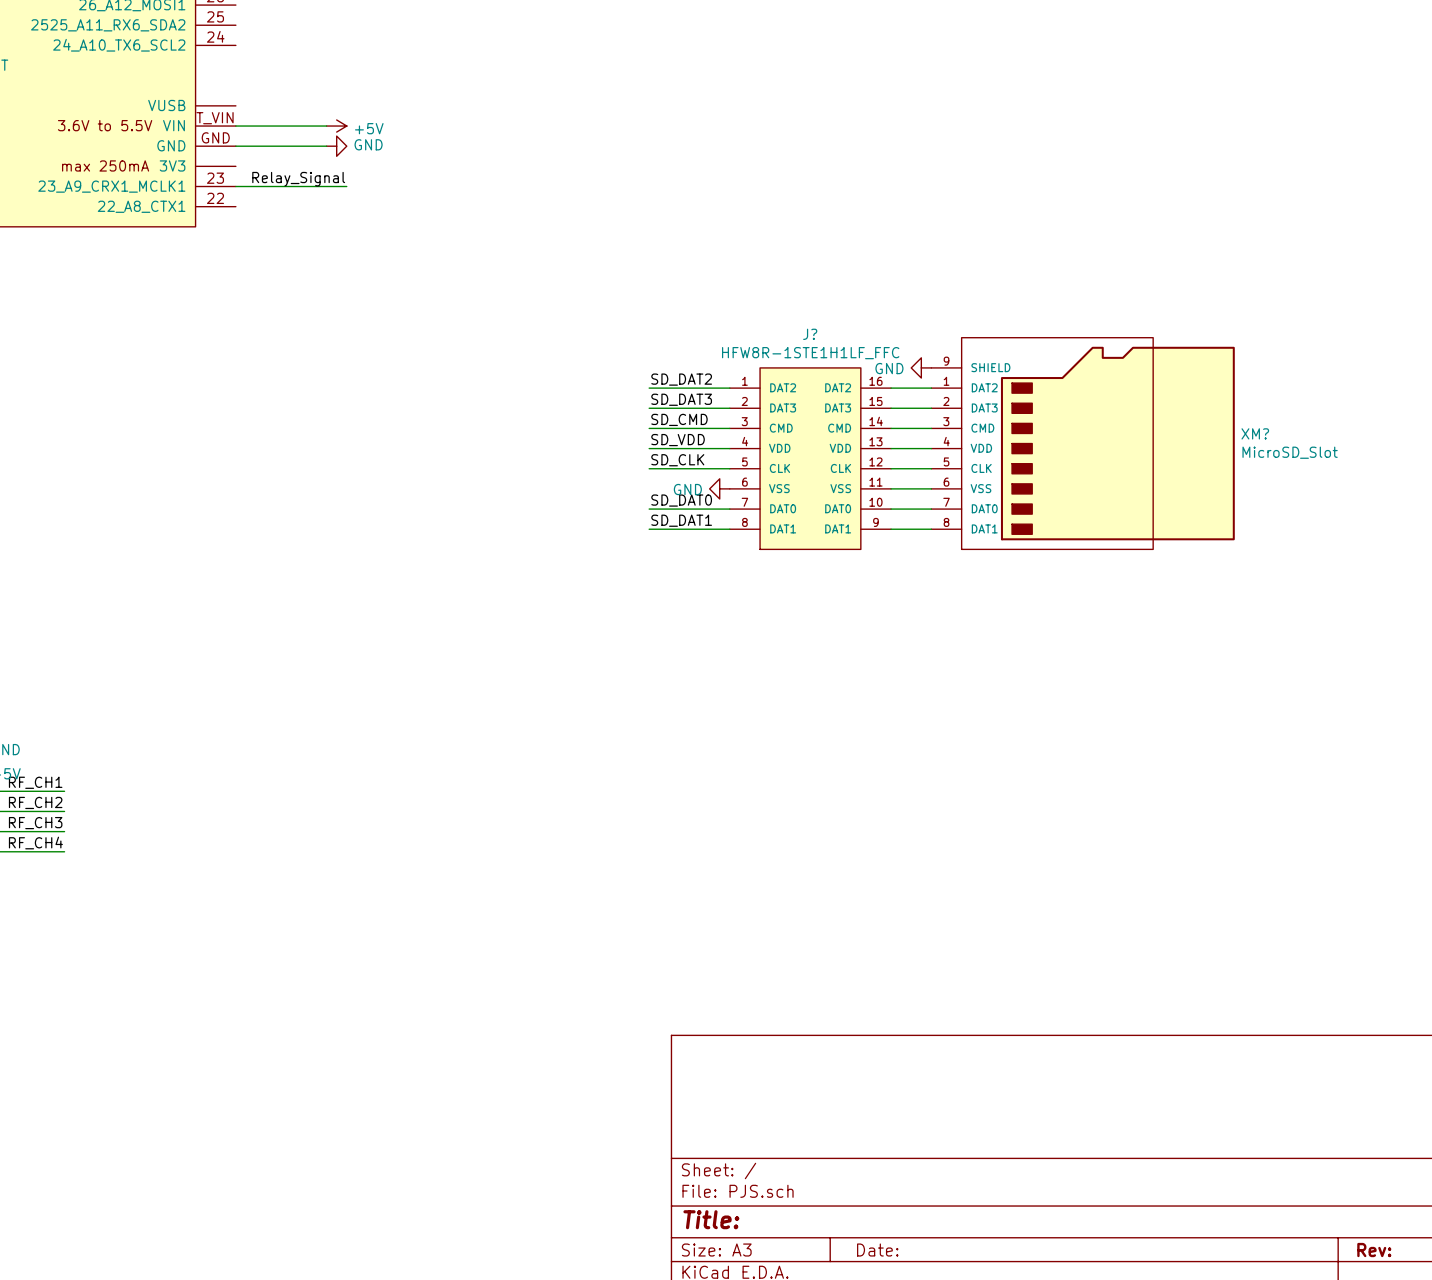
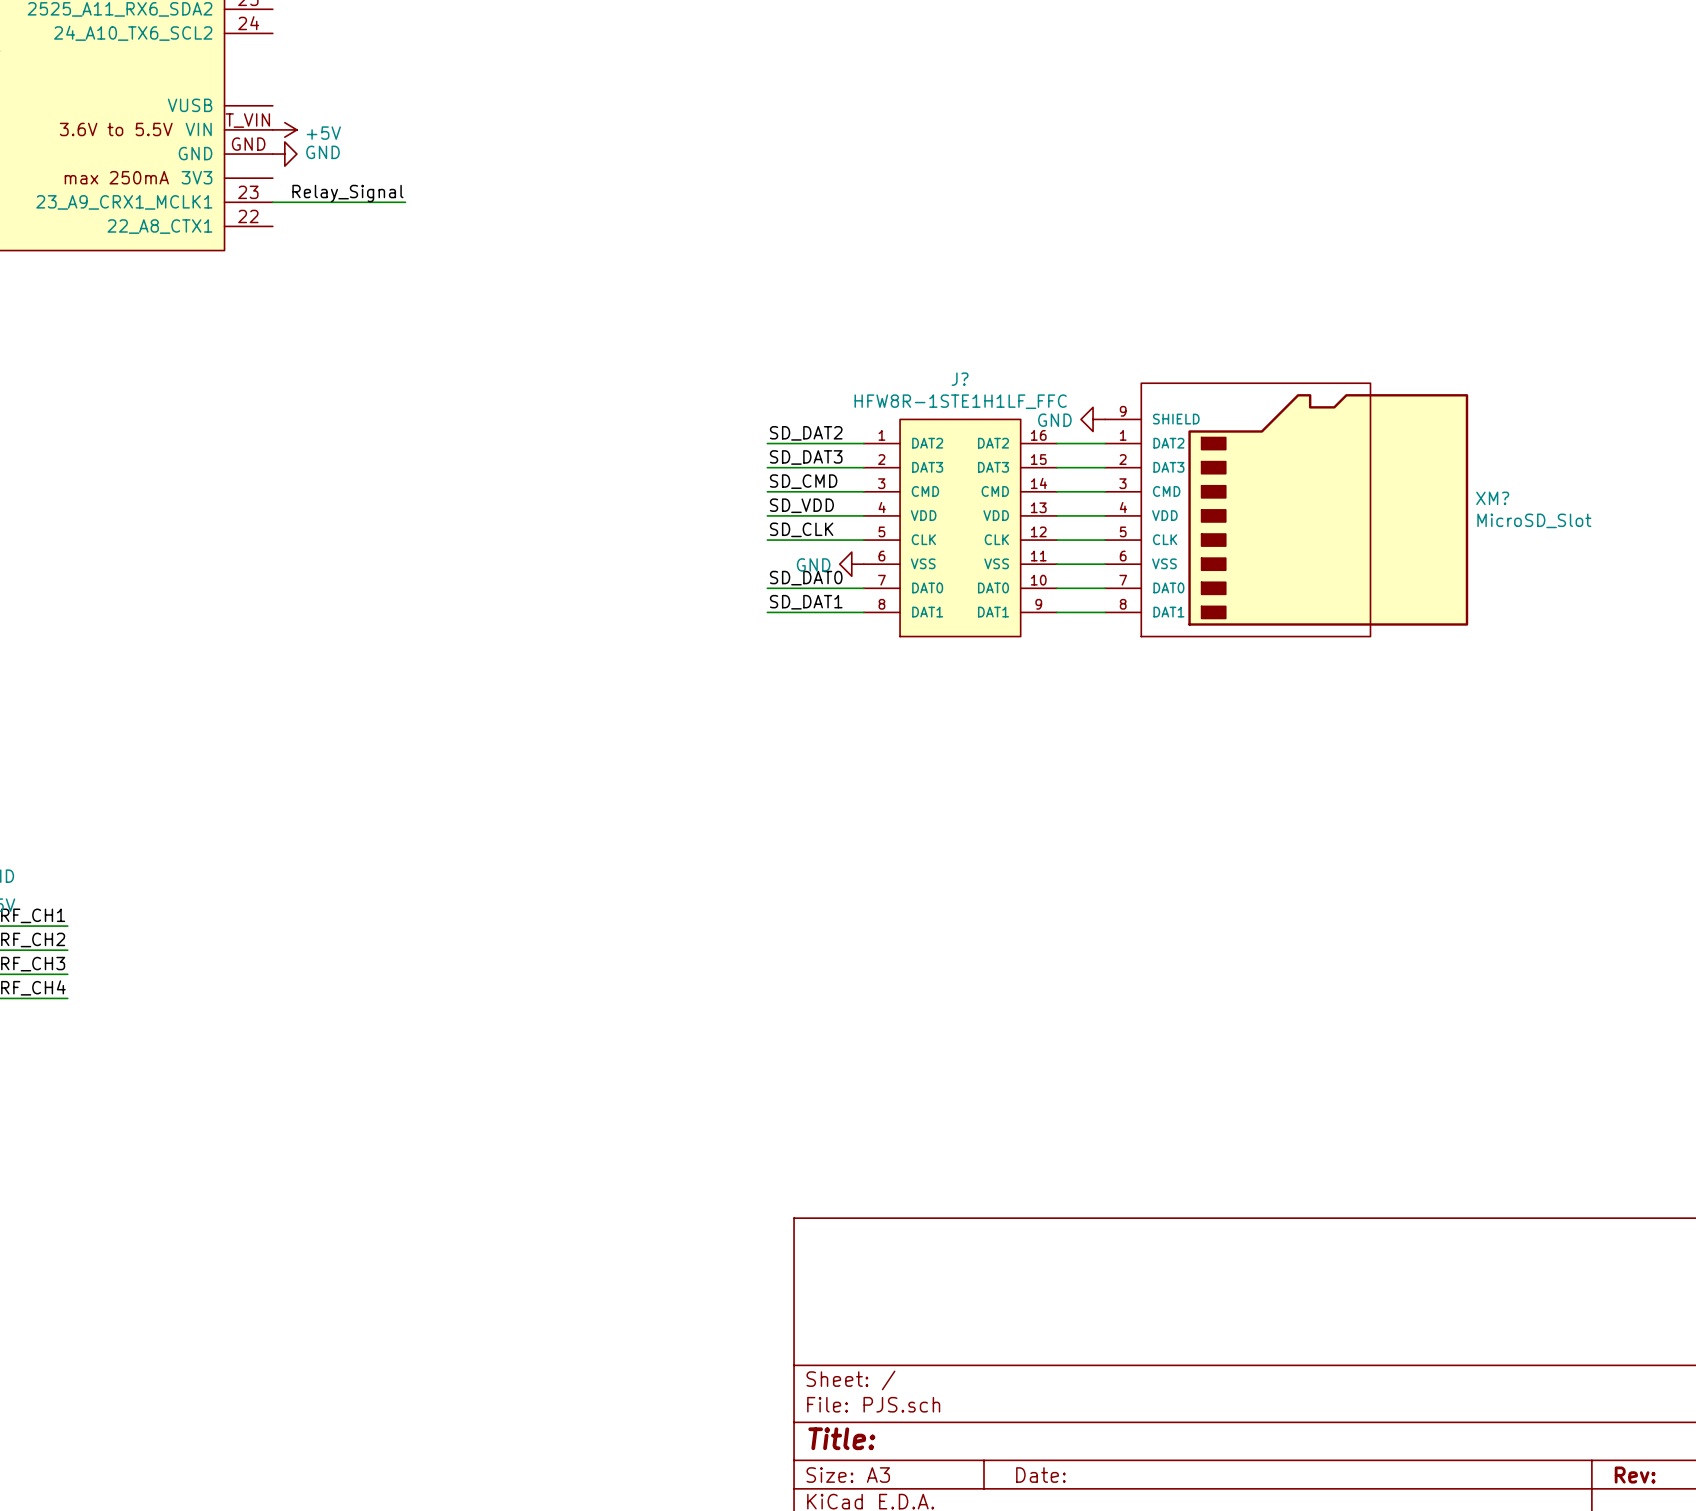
wire: (235, 126) (326, 126) -> none
power symbol position: +5V (336, 126) -> +5V (284, 129)
wire: (235, 146) (326, 146) -> none
power symbol position: GND (336, 146) -> GND (284, 154)

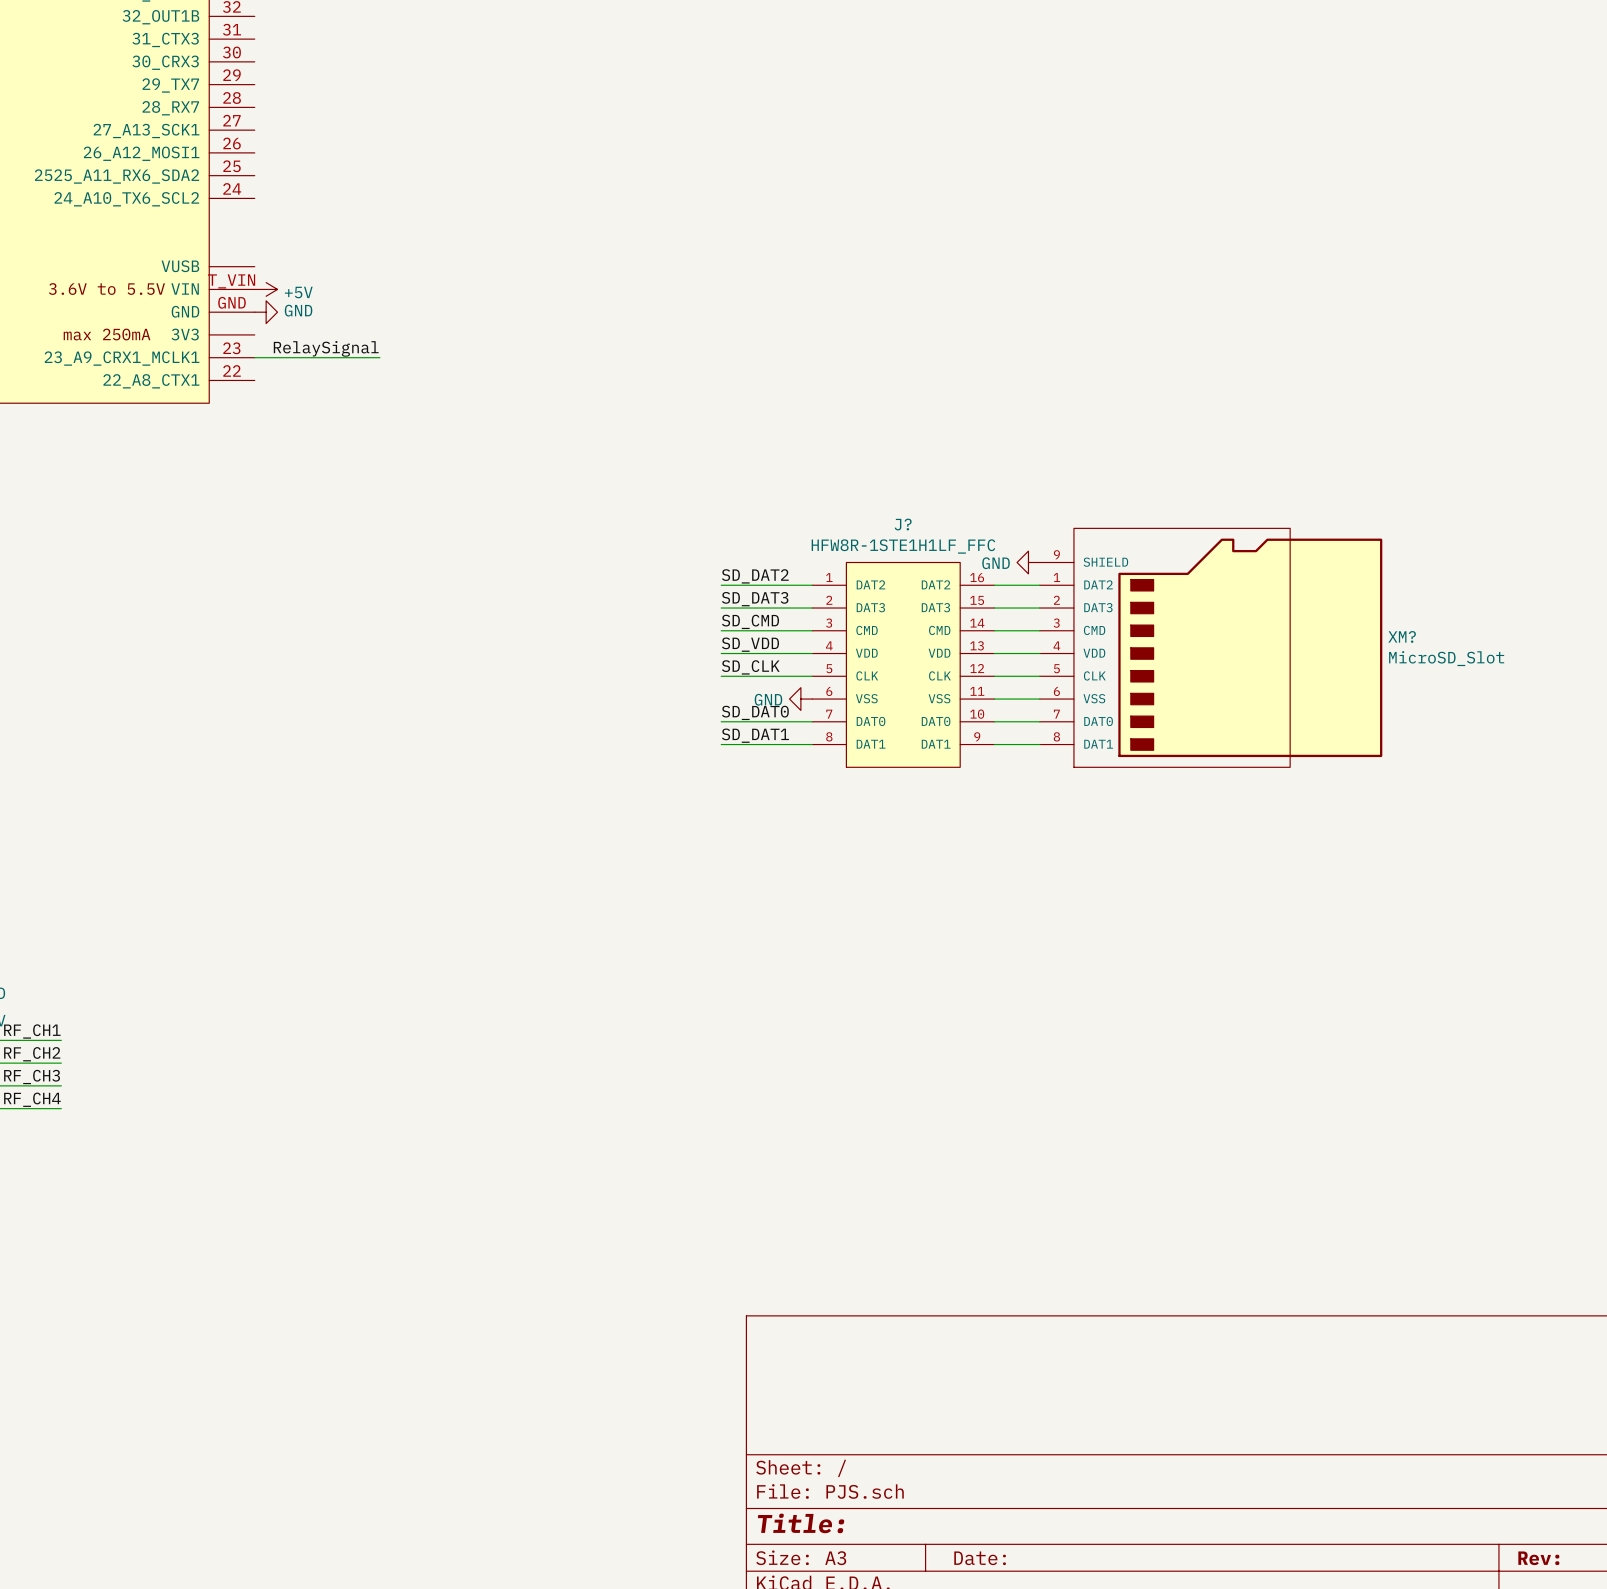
label: Relay_Signal (347, 193) -> RelaySignal (326, 348)

